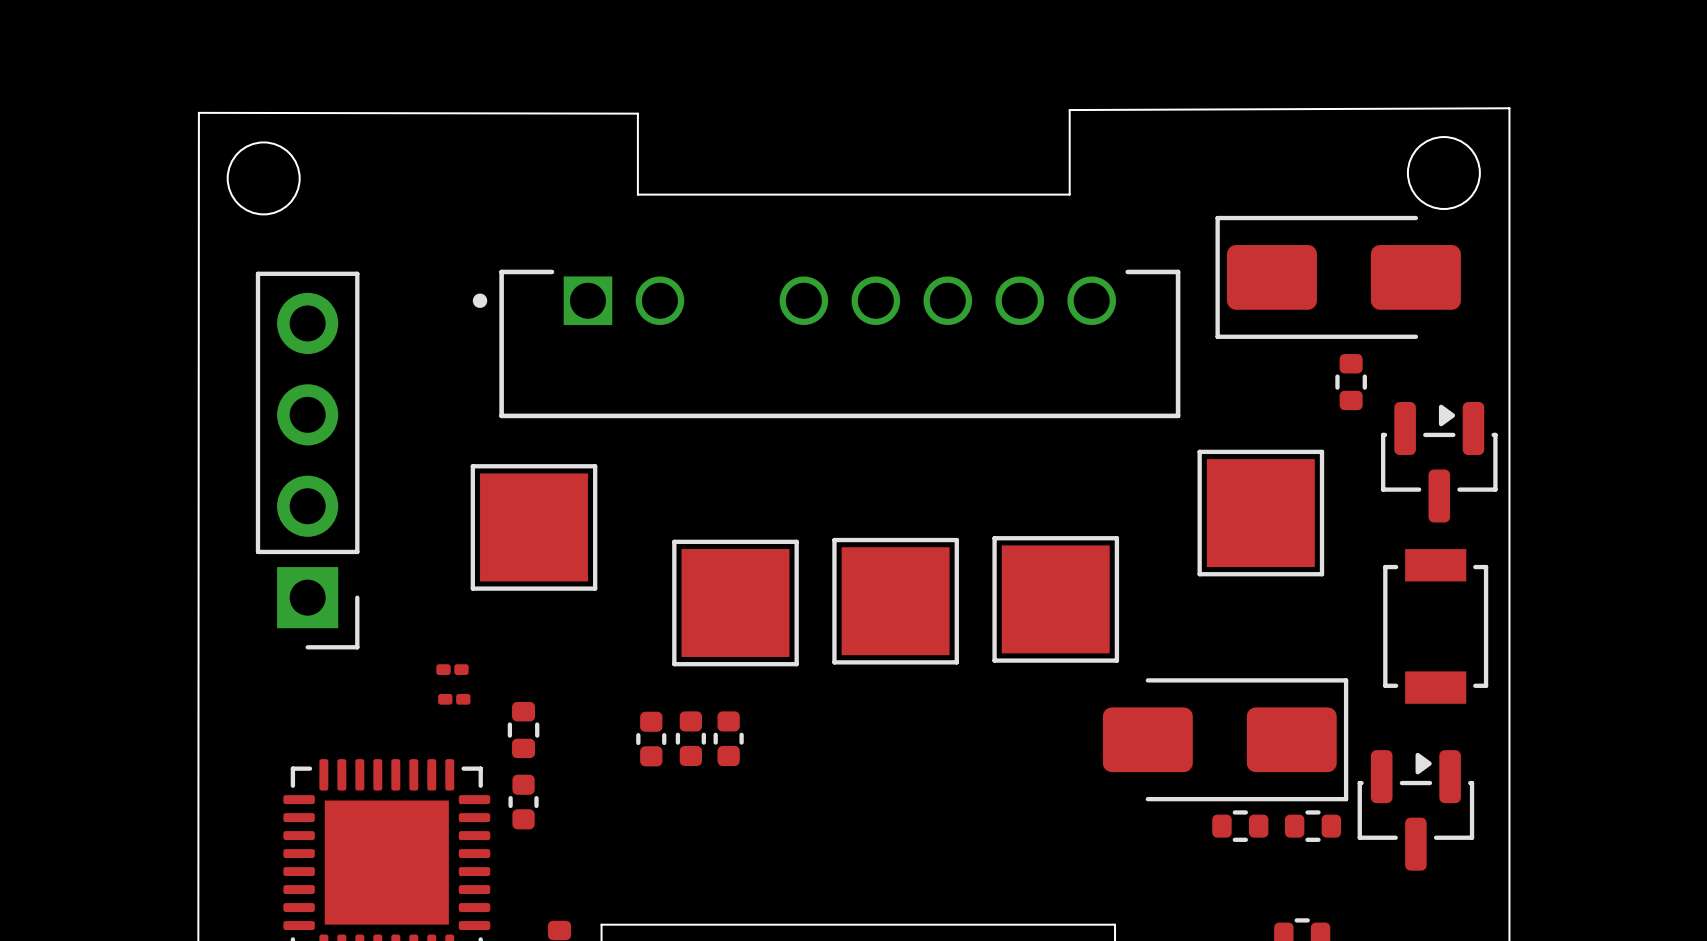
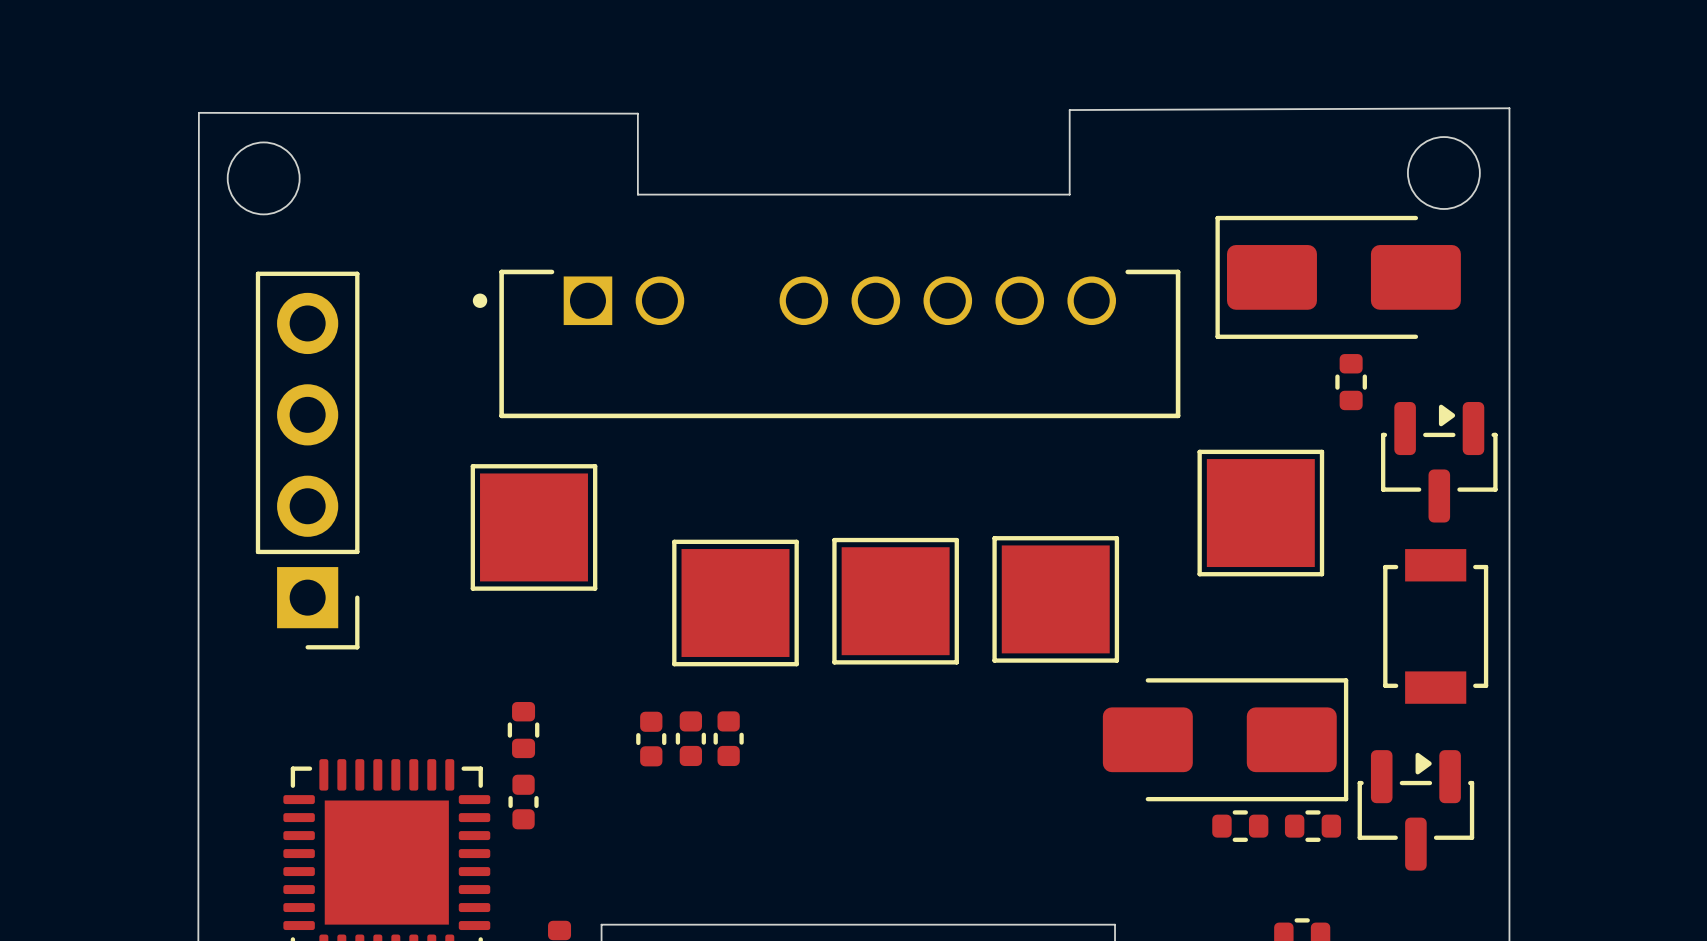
part: (452, 669) -> none
part: (454, 699) -> none

